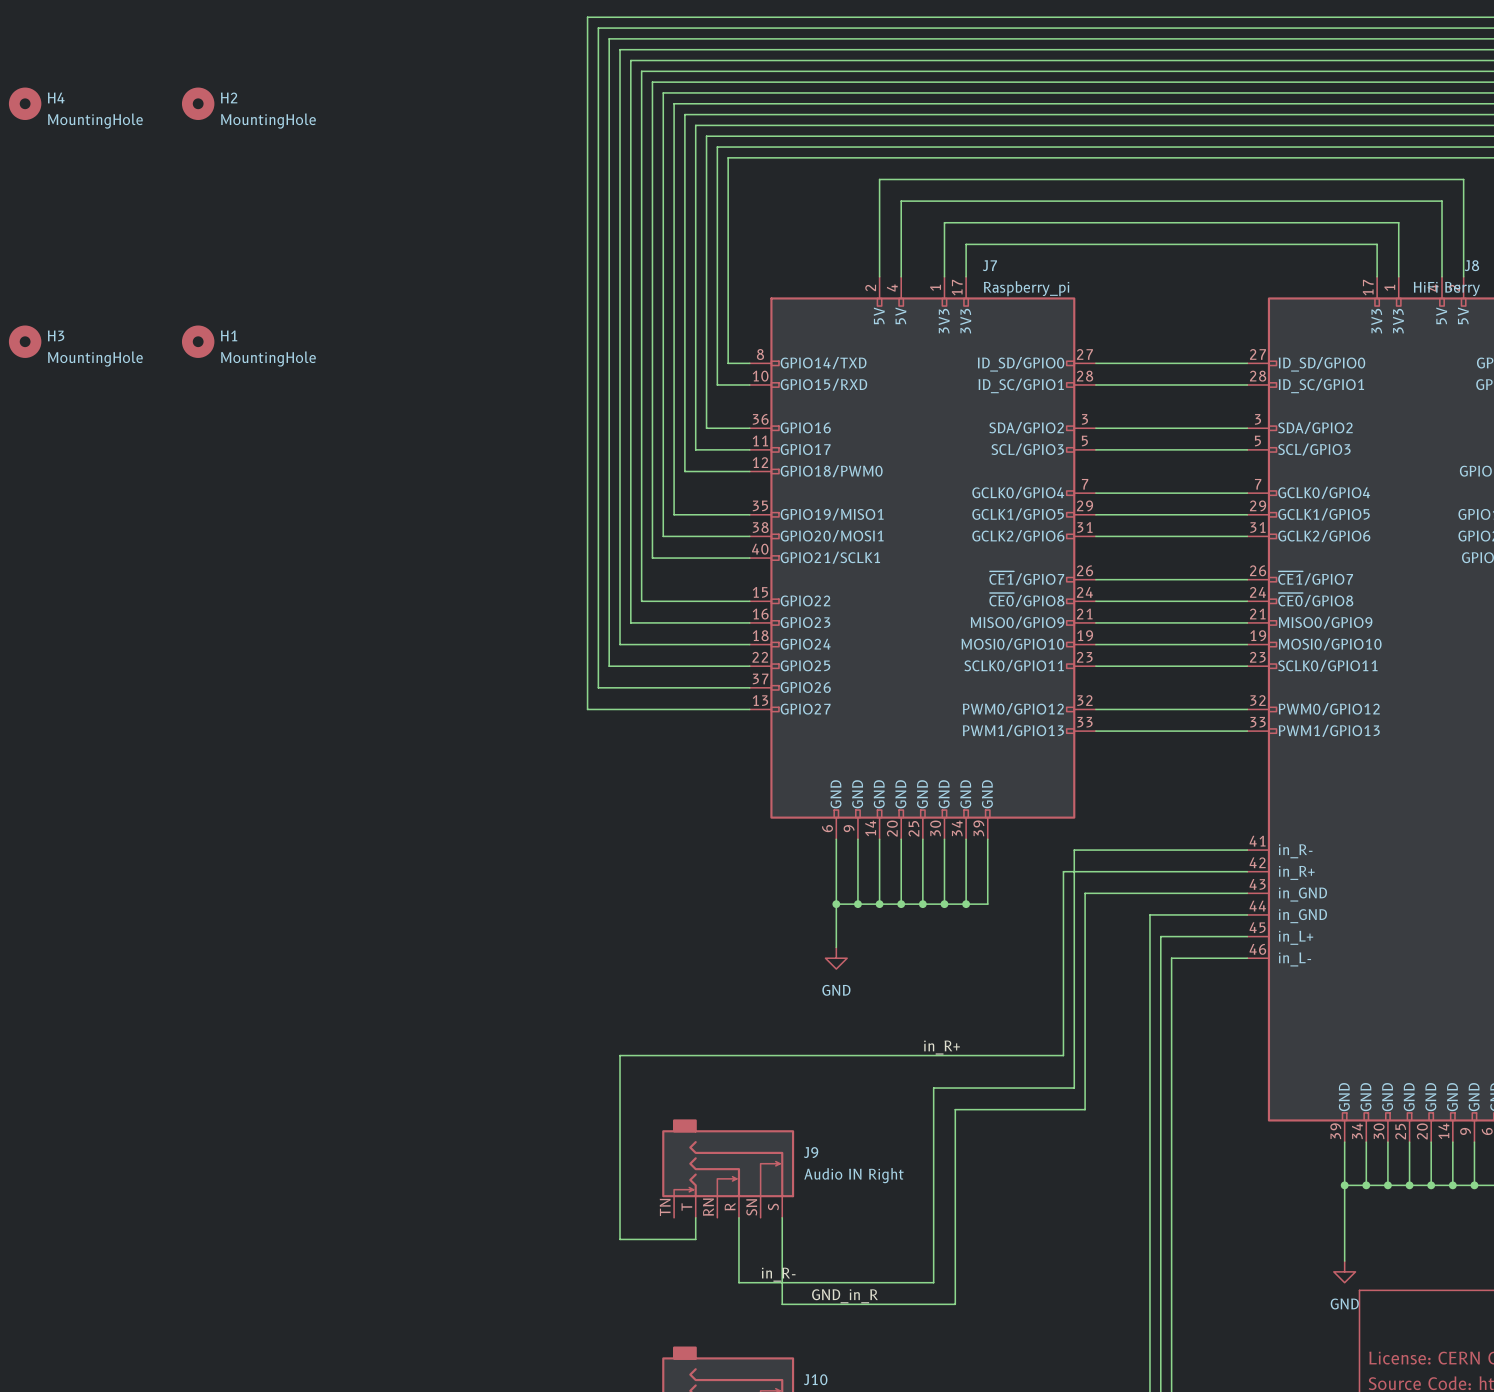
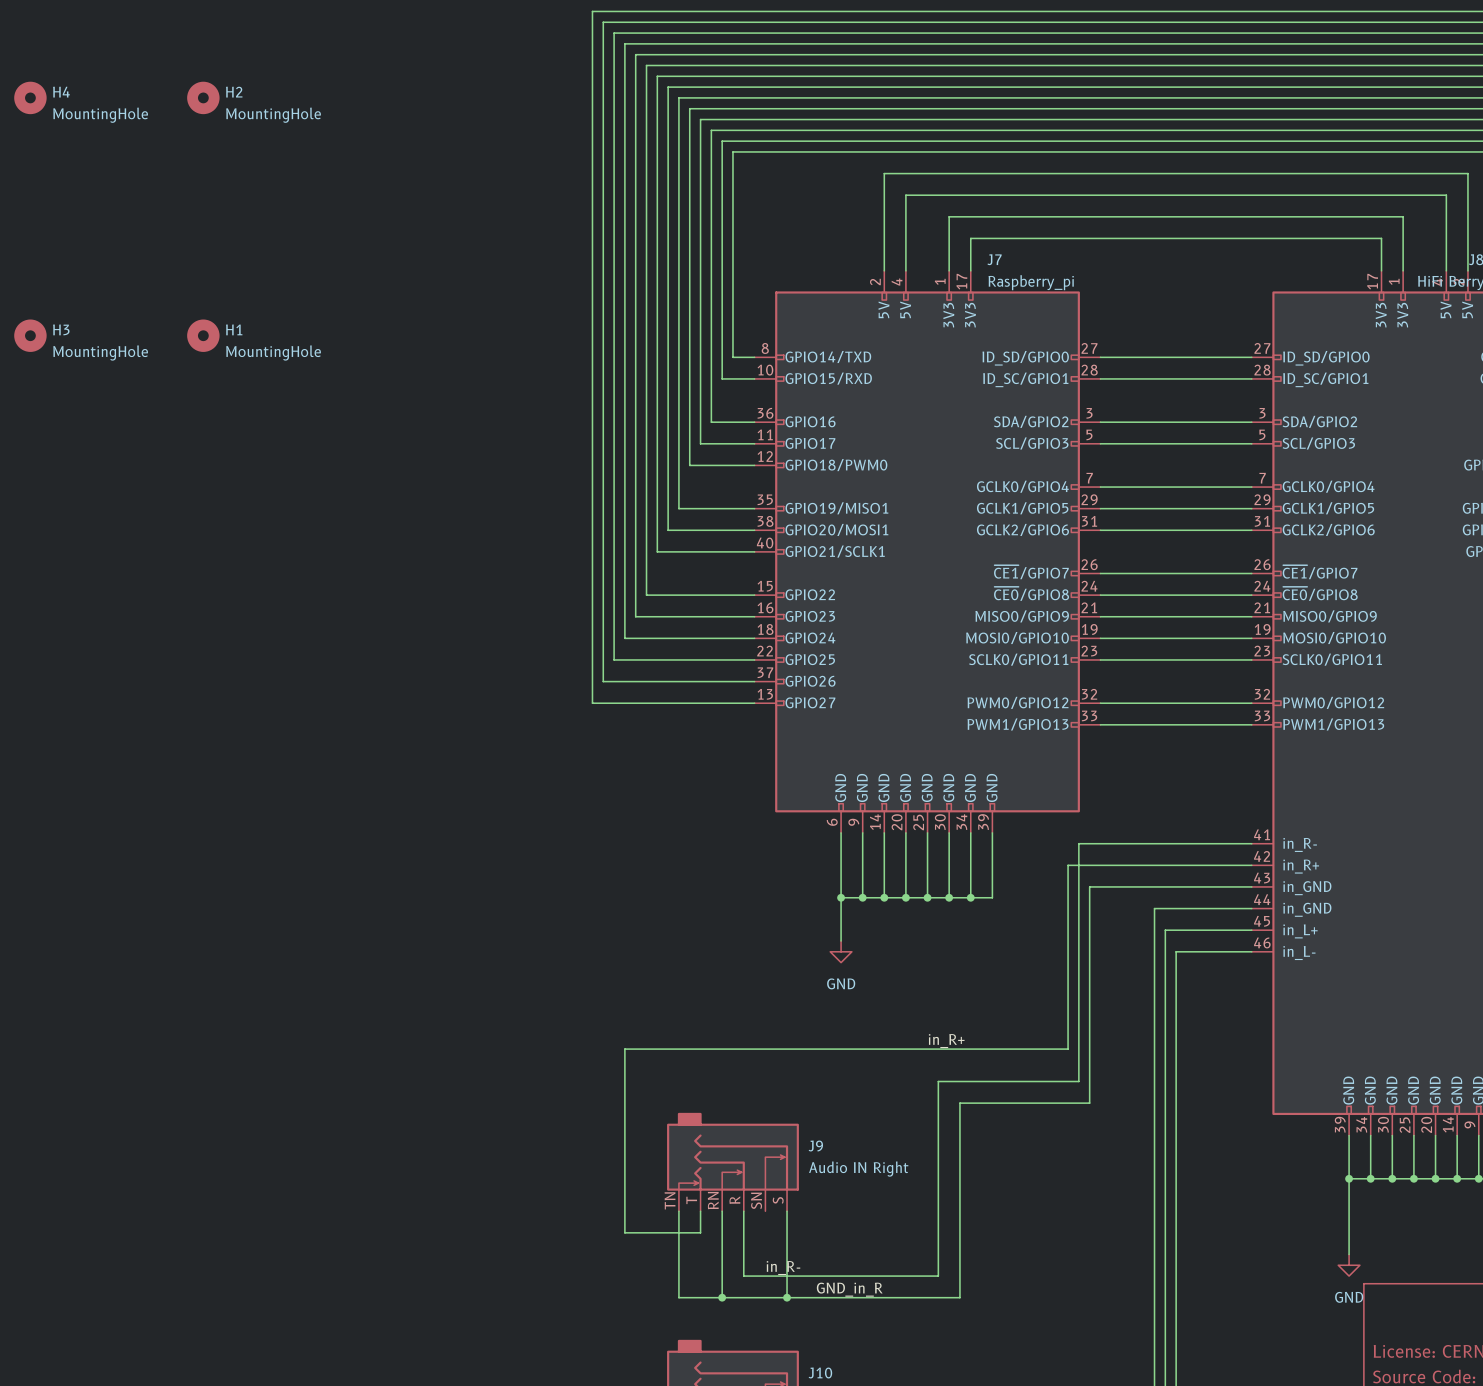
wire: none -> (678, 1211) (678, 1297) (787, 1297)
wire: none -> (722, 1211) (722, 1297)
junction: none -> (722, 1297)
junction: none -> (787, 1297)

